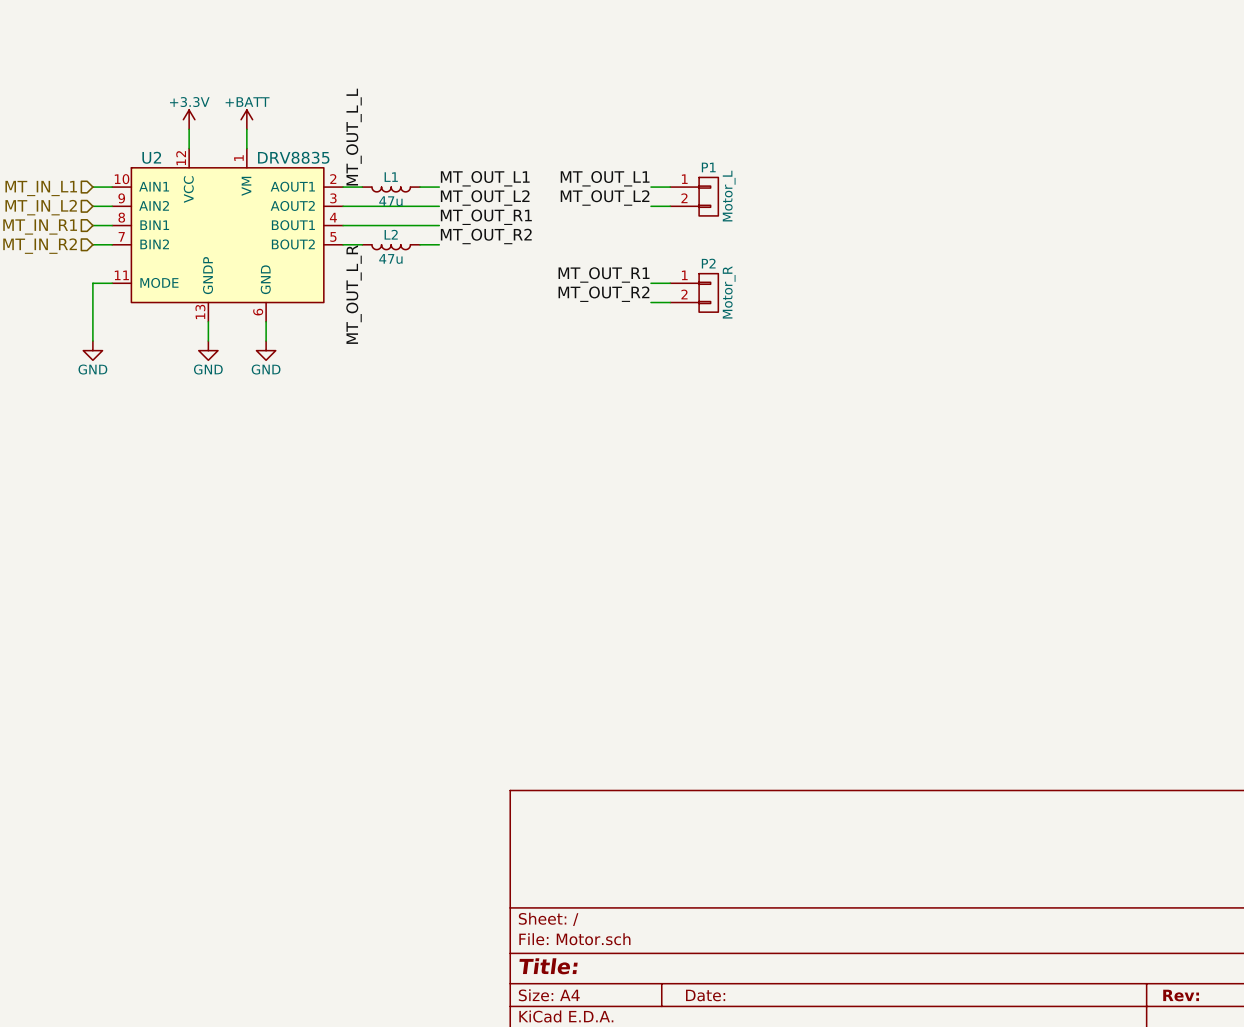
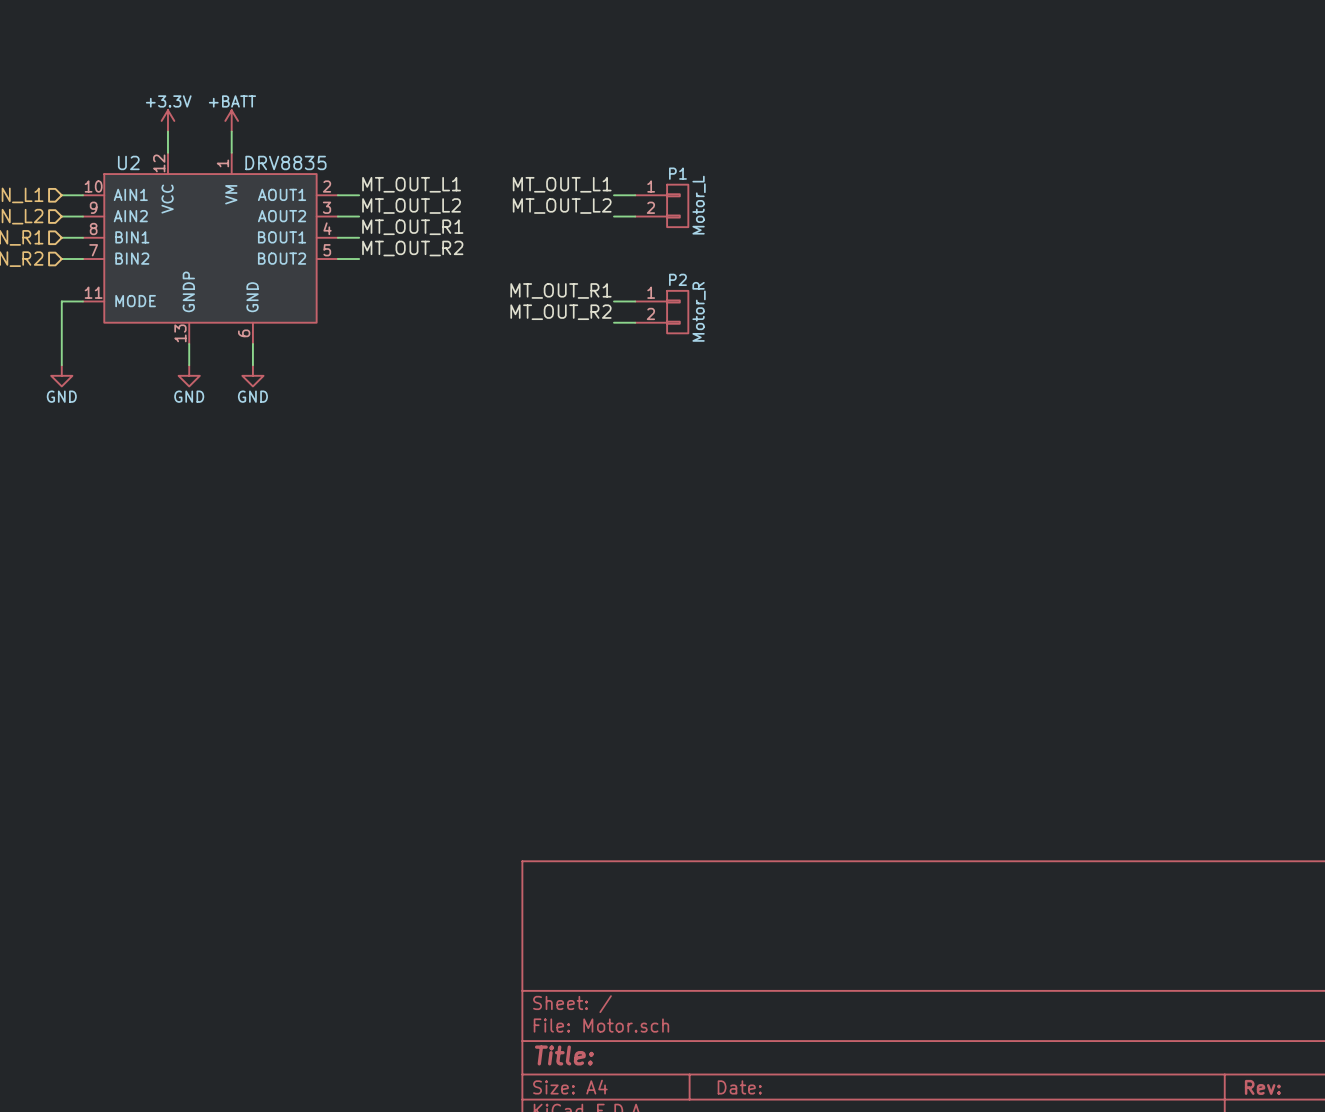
label: MT_OUT_L_L (354, 137) -> MT_OUT_L1 (411, 184)
label: MT_OUT_L1 (485, 178) -> none
label position: MT_OUT_L1 (605, 178) -> MT_OUT_L1 (562, 184)
wire: (420, 187) (439, 187) -> none
wire: (650, 187) (670, 187) -> (613, 195) (635, 195)
L1: 47u (391, 189) -> none
P1 position: (694, 196) -> (661, 205)
label: none -> MT_OUT_L2 (411, 206)
label: MT_OUT_L2 (485, 198) -> none
label position: MT_OUT_L2 (605, 198) -> MT_OUT_L2 (562, 206)
wire: (362, 206) (439, 206) -> none
wire: (650, 206) (670, 206) -> (613, 216) (635, 216)
label position: MT_OUT_R1 (486, 217) -> MT_OUT_R1 (412, 227)
wire: (362, 225) (439, 225) -> none
label position: MT_OUT_R2 (486, 236) -> MT_OUT_R2 (412, 248)
wire: (420, 244) (439, 244) -> none
L2: 47u (391, 247) -> none
label position: MT_OUT_R1 (604, 274) -> MT_OUT_R1 (560, 290)
wire: (650, 283) (670, 283) -> (613, 301) (635, 301)
P2 position: (694, 292) -> (661, 312)
label: MT_OUT_L_R (354, 294) -> none
label position: MT_OUT_R2 (603, 294) -> MT_OUT_R2 (560, 312)
wire: (650, 302) (670, 302) -> (613, 322) (635, 322)

